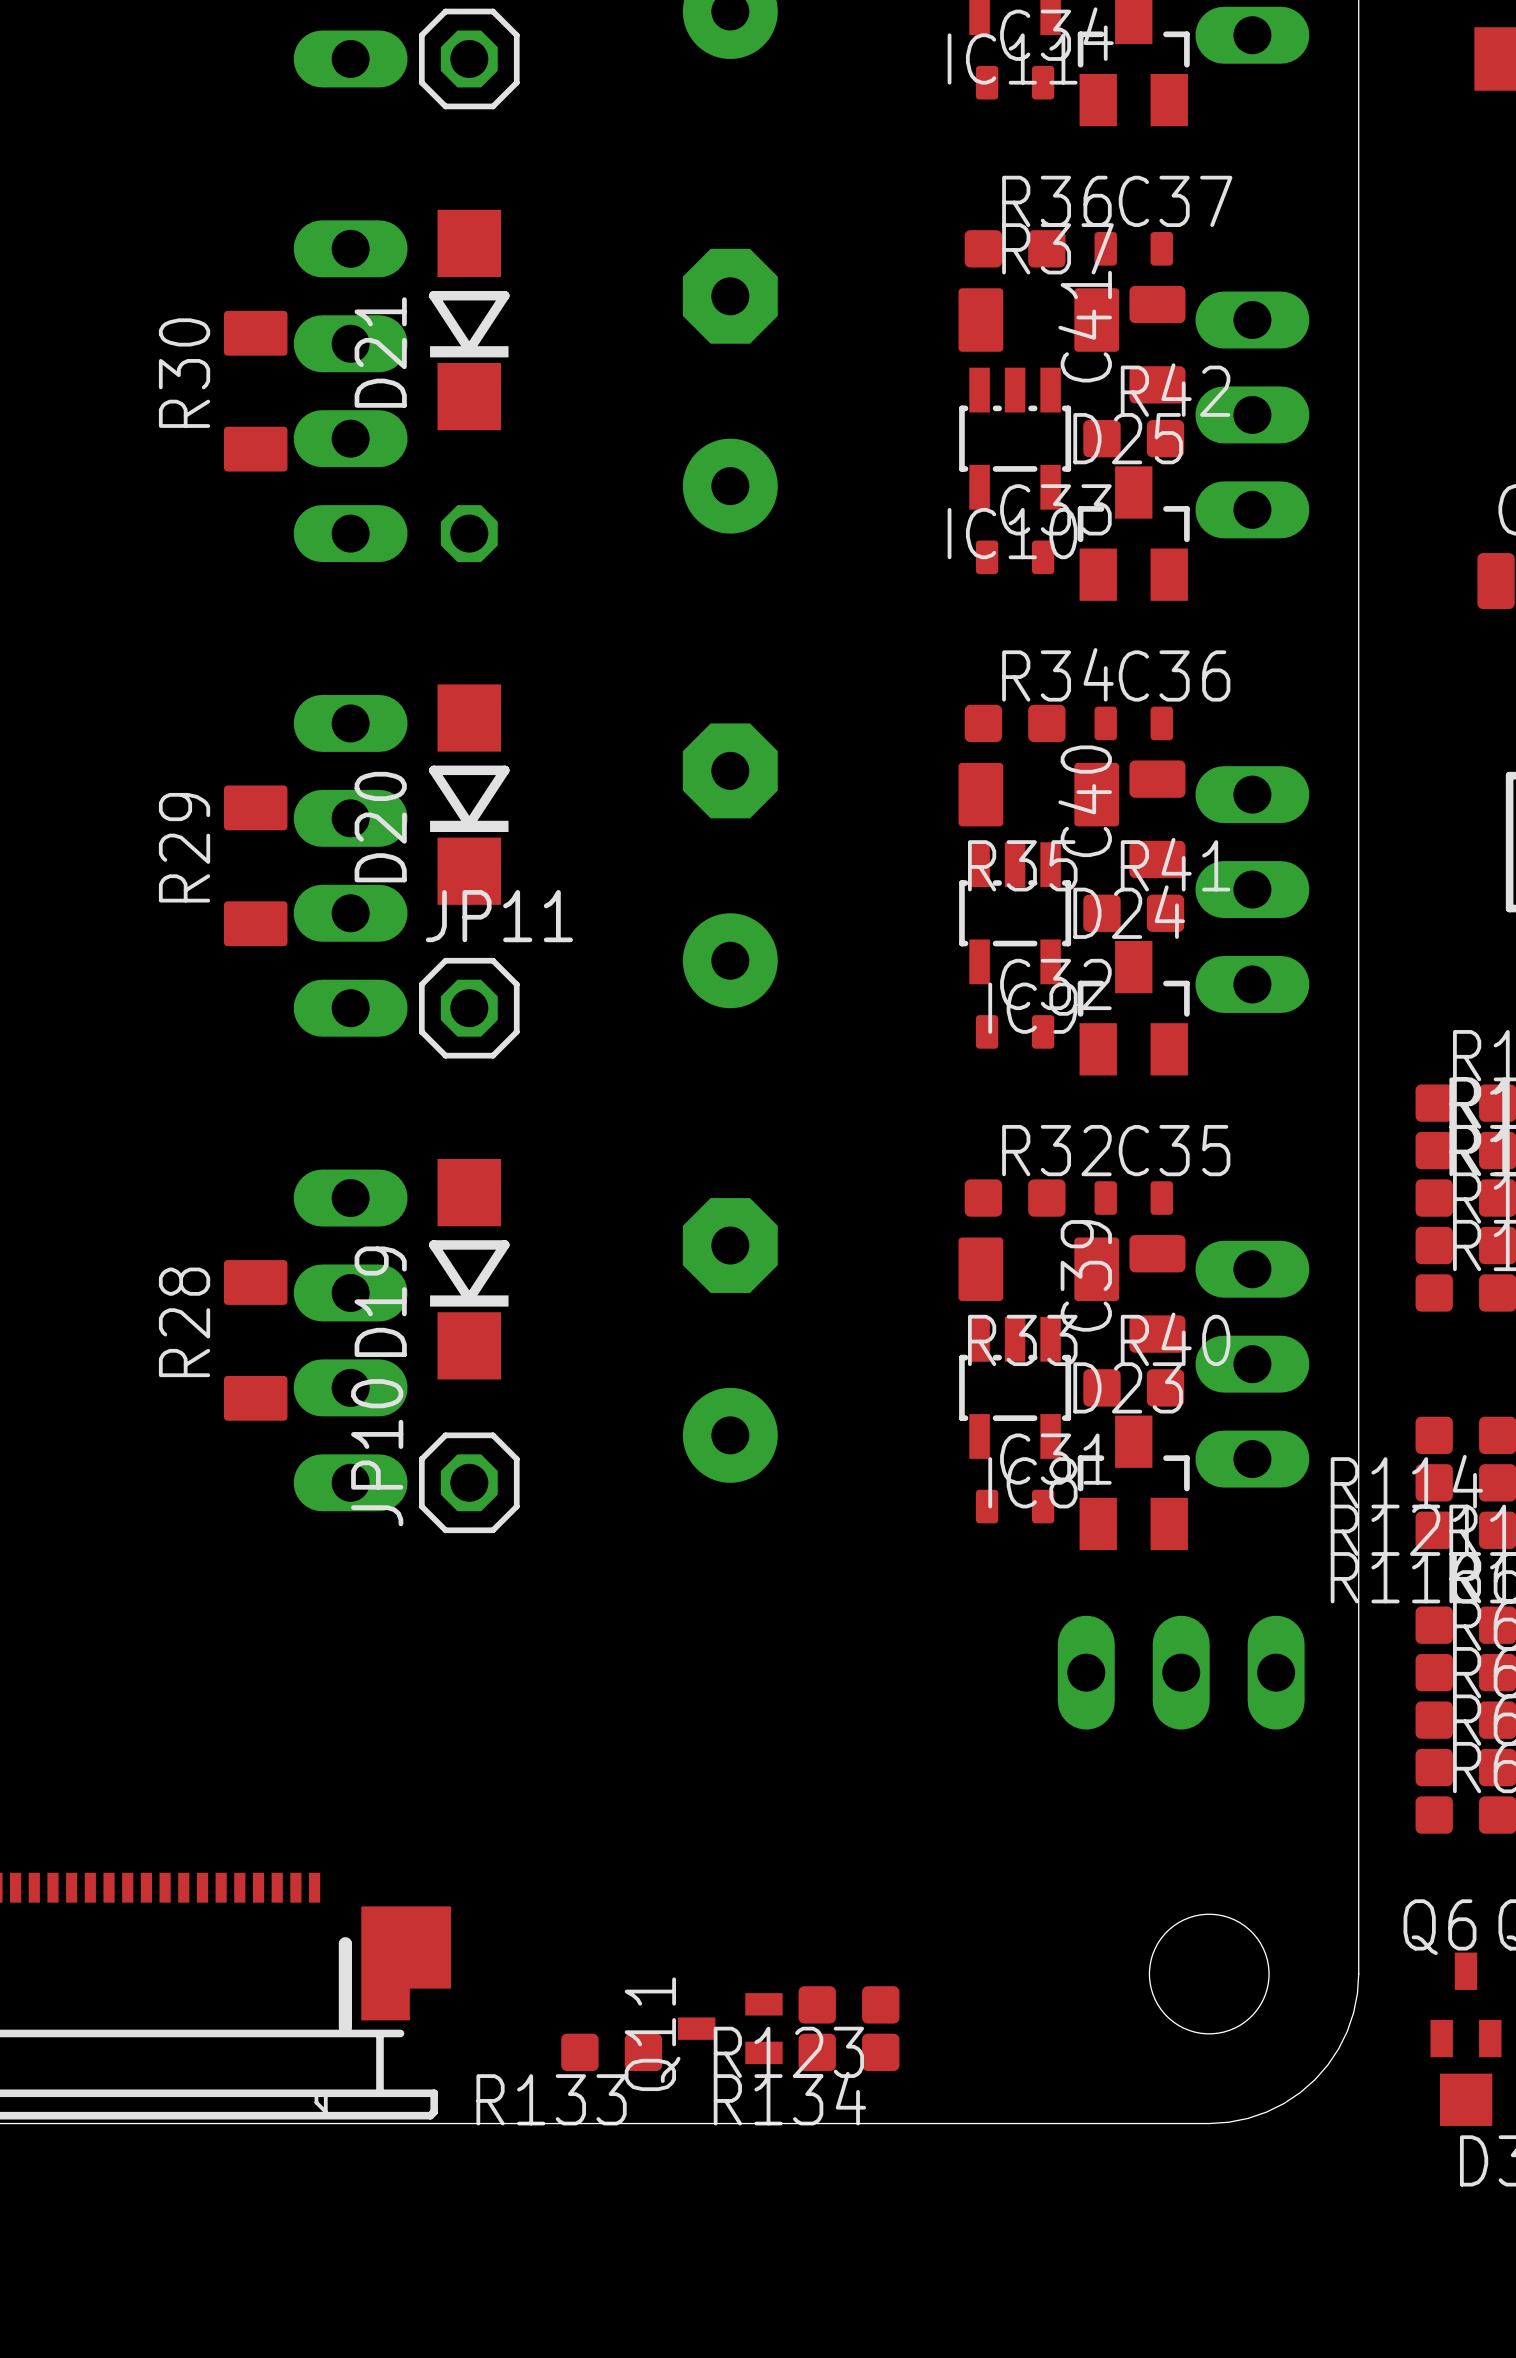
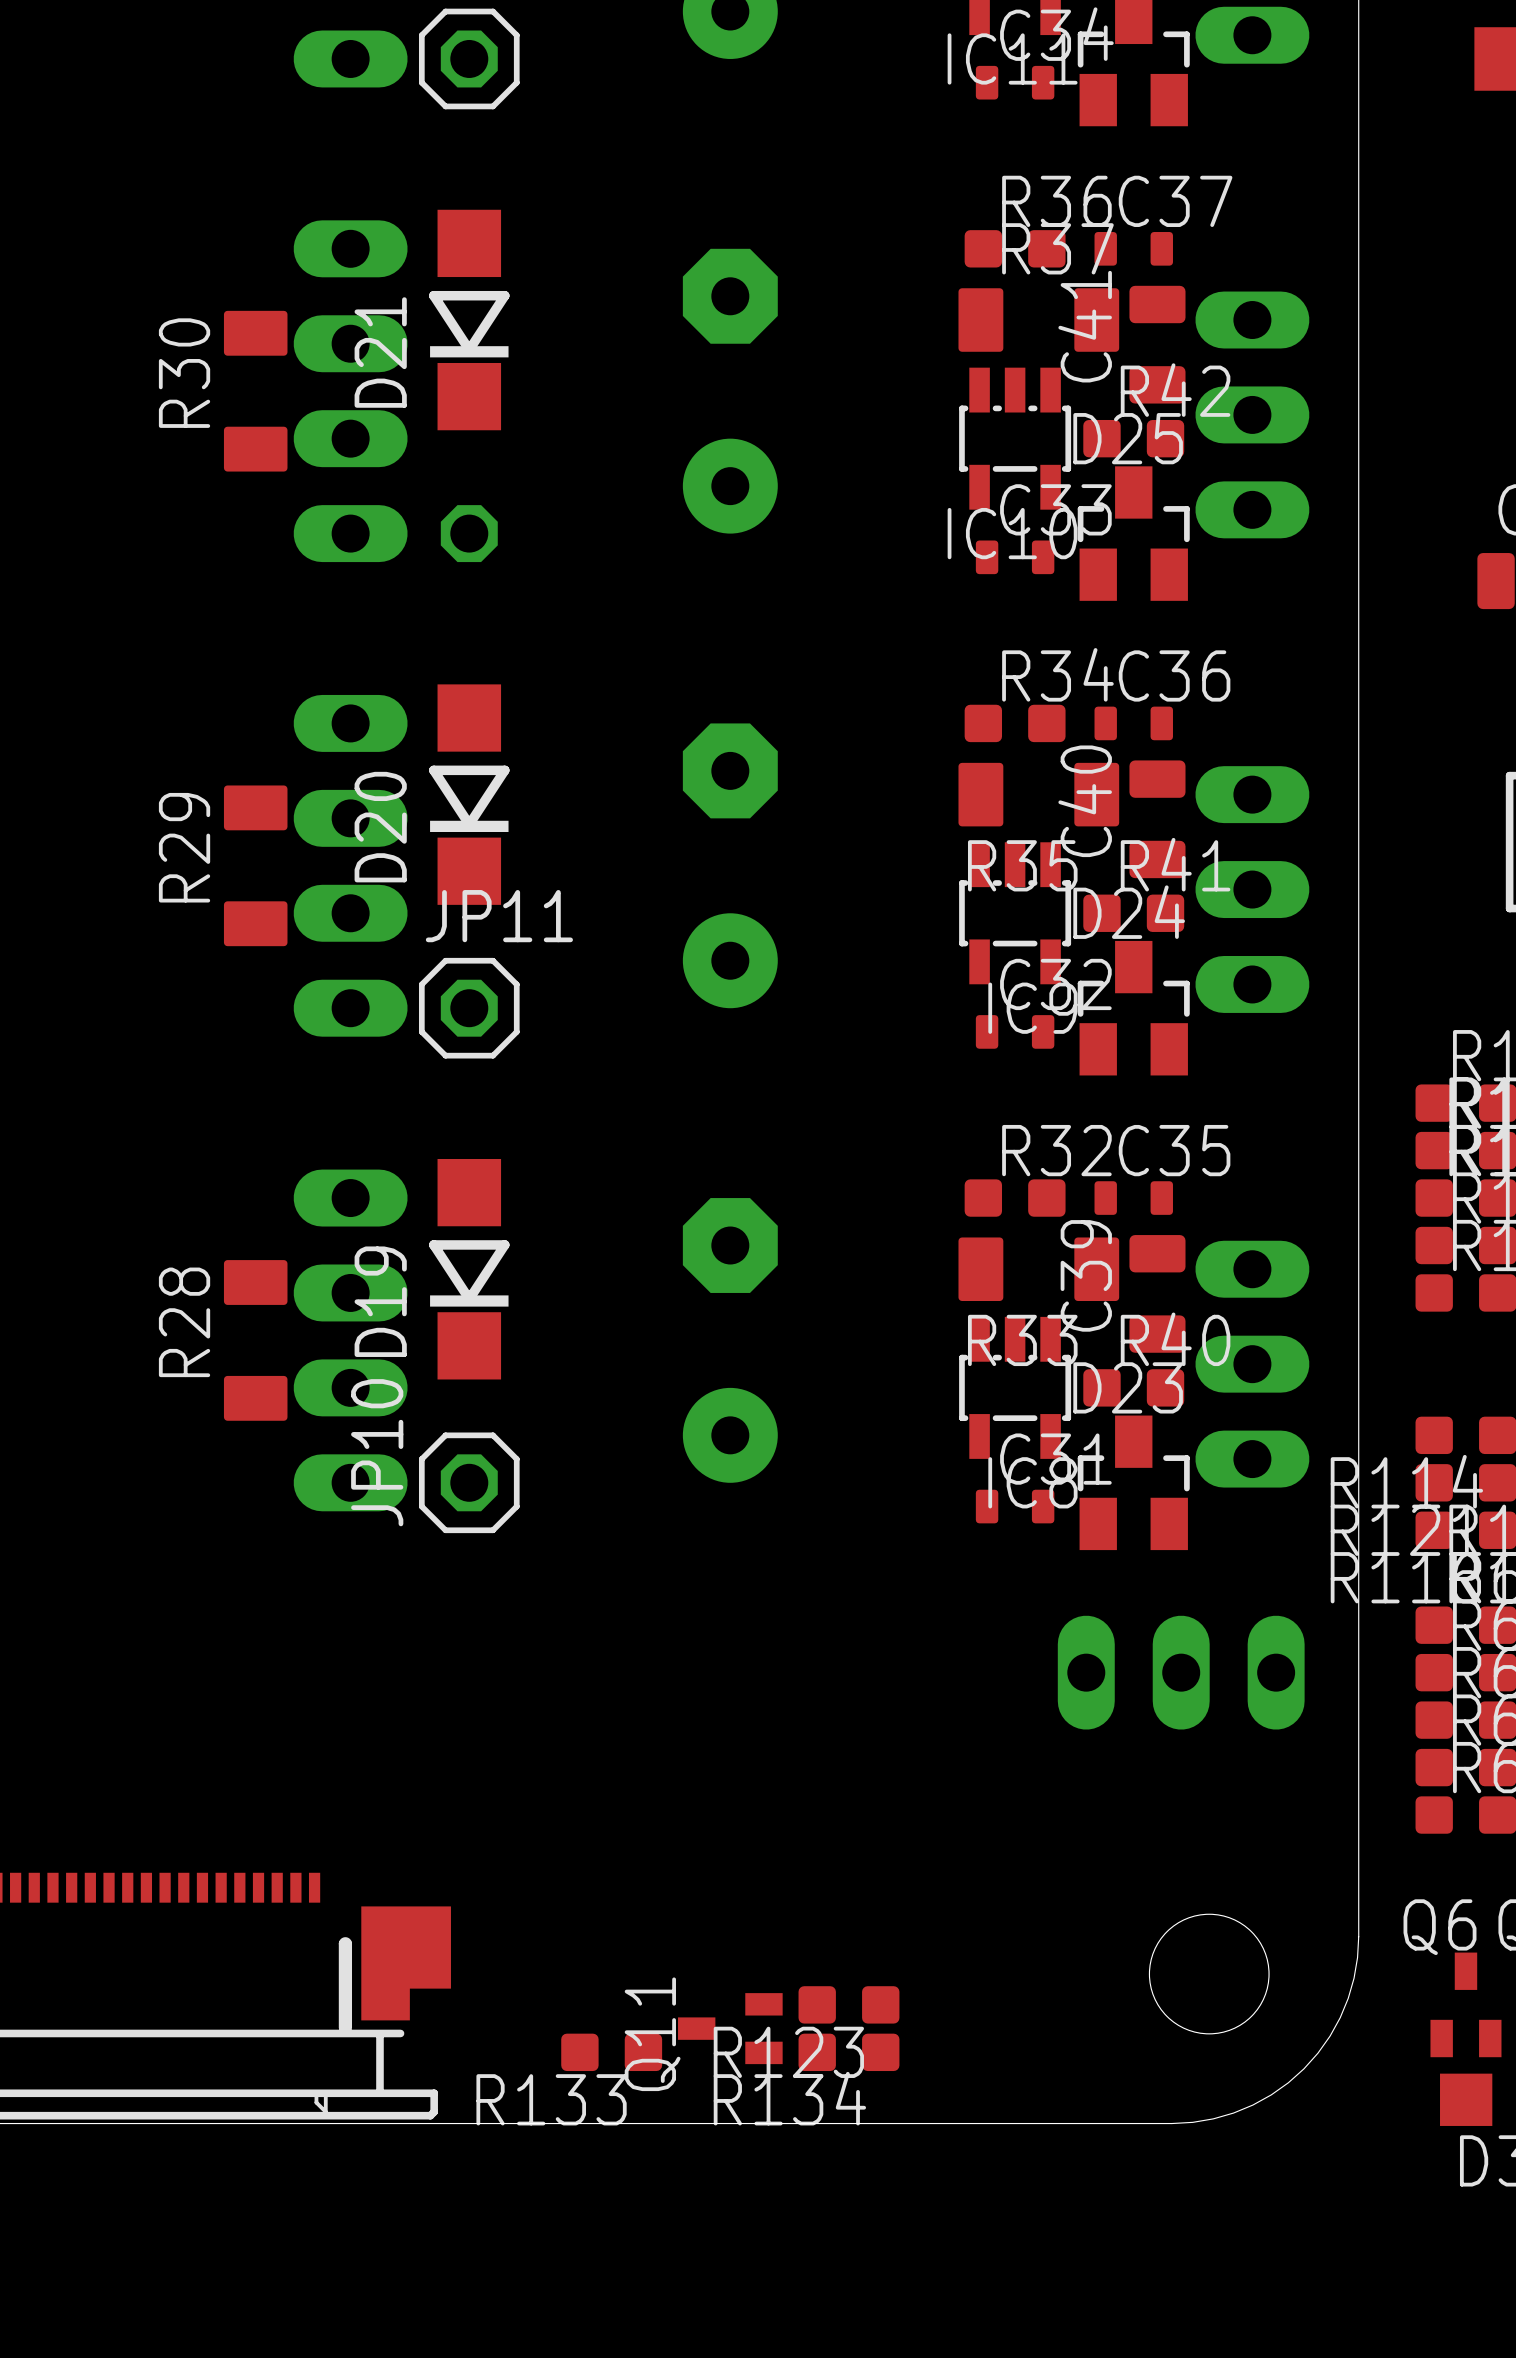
board edge: (1358, 1936) (1357, 1993) (1353, 2012) (1338, 2048) (1314, 2079) (1283, 2103) (1247, 2118) (1228, 2122) (1171, 2123) -> (1358, 1936) (1357, 1957) (1348, 1998) (1330, 2036) (1303, 2068) (1271, 2094) (1233, 2113) (1192, 2122) (1171, 2123)

